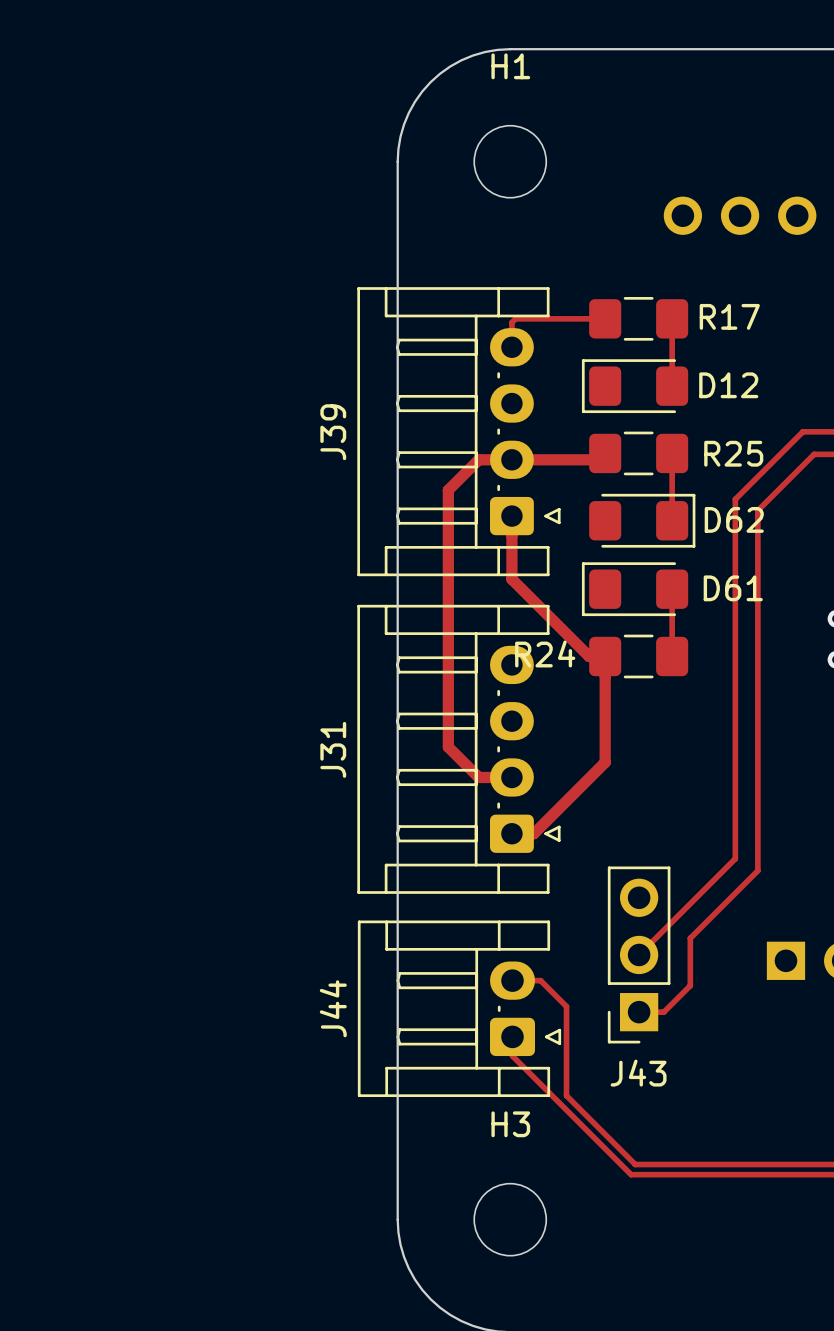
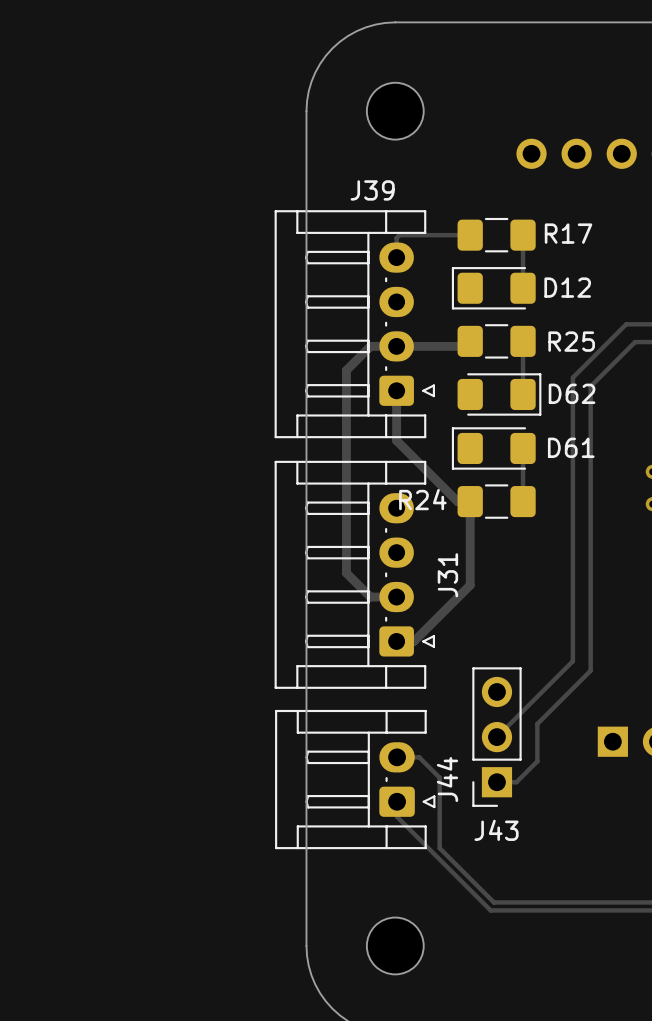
H1 name: H1 (510, 66) -> none
J39 name rotation: 0° (333, 432) -> 90° clockwise (372, 190)
J39 name position: J39 (333, 432) -> J39 (372, 190)
J31 name position: J31 (333, 749) -> J31 (447, 575)
J44 name position: J44 (333, 1008) -> J44 (447, 779)
H3 name: H3 (510, 1124) -> none

